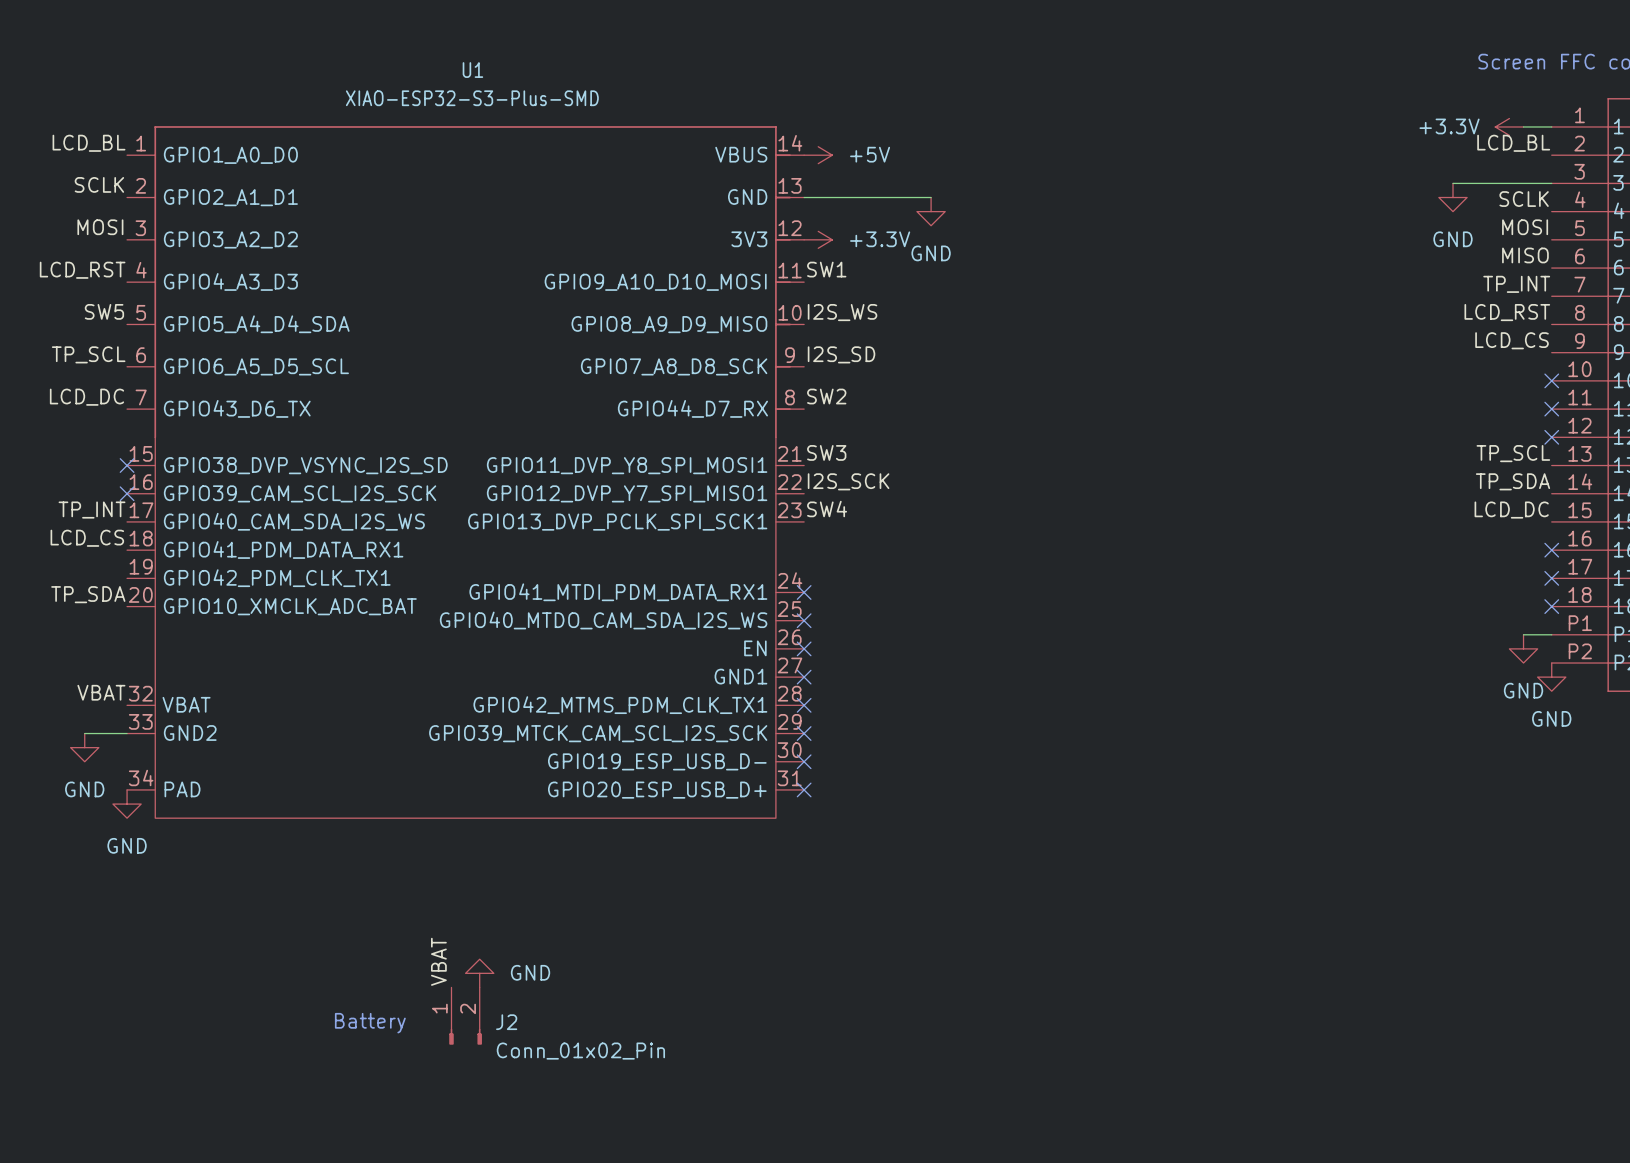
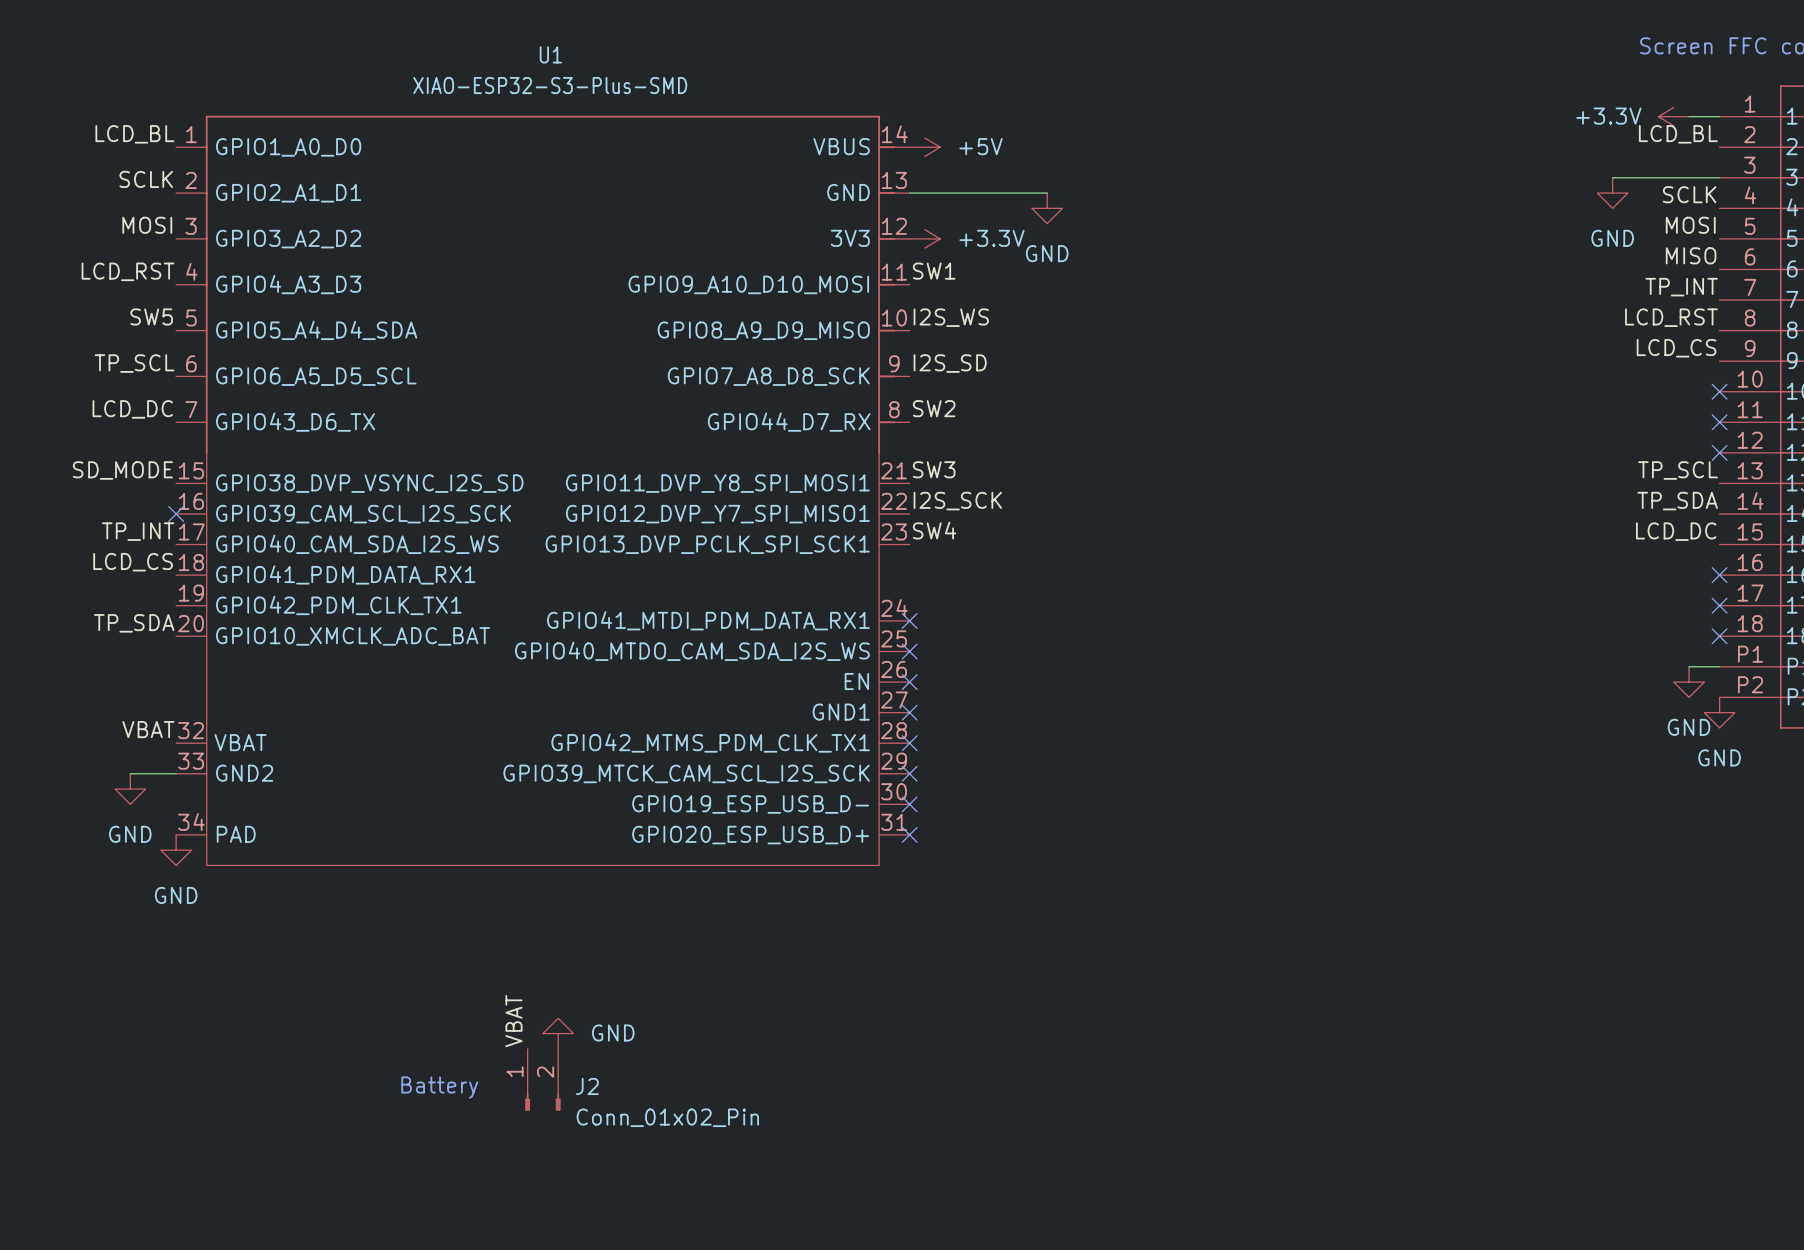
label: none -> SD_MODE (122, 470)
no-connect mark: (127, 465) -> none

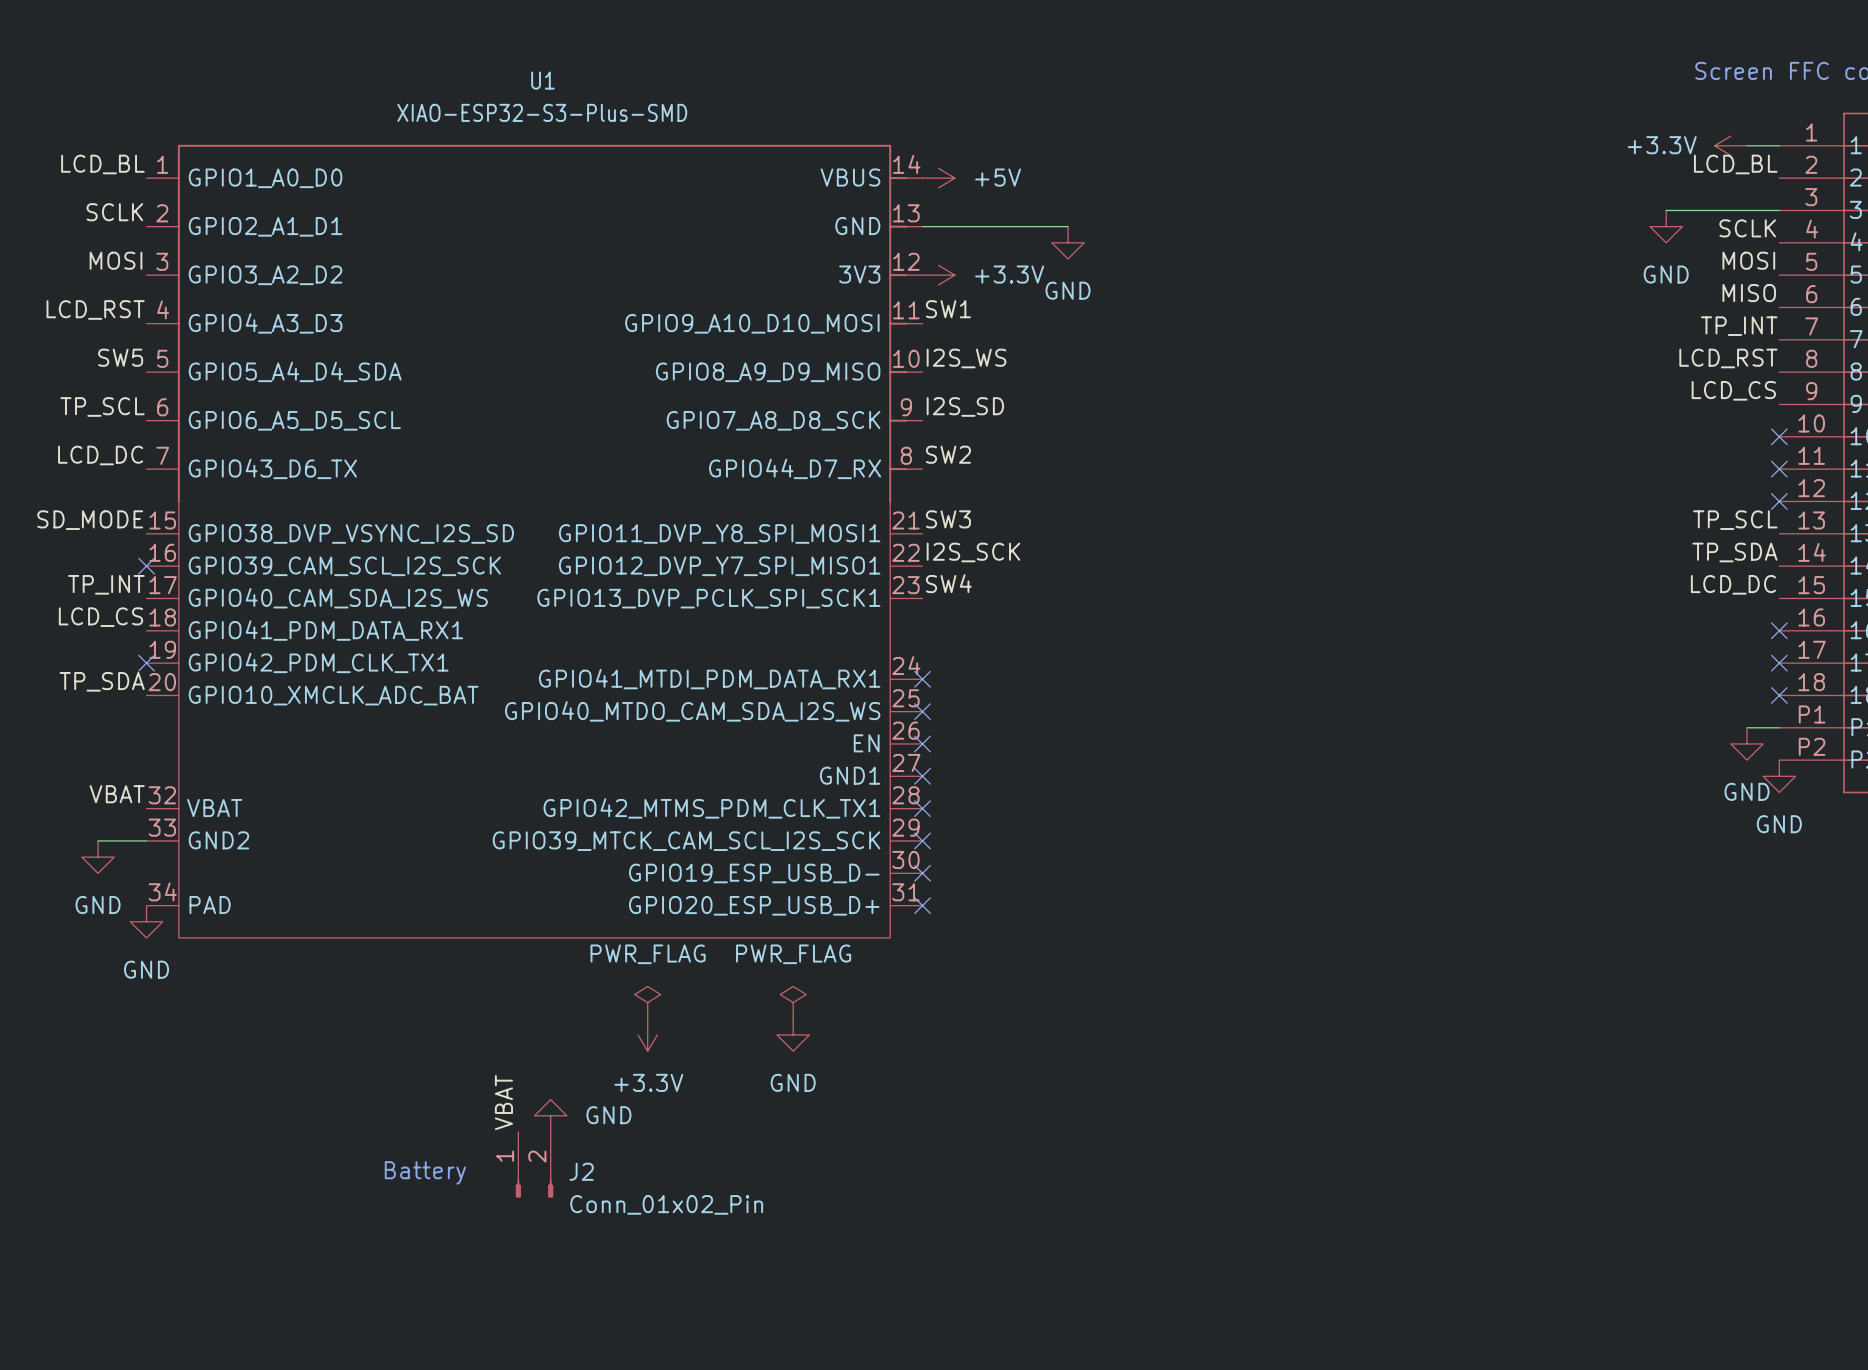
no-connect mark: none -> (146, 663)
power symbol: none -> PWR_FLAG (647, 1002)
power symbol: none -> PWR_FLAG (793, 1002)
power symbol: none -> +3.3V (647, 1034)
power symbol: none -> GND (793, 1034)

